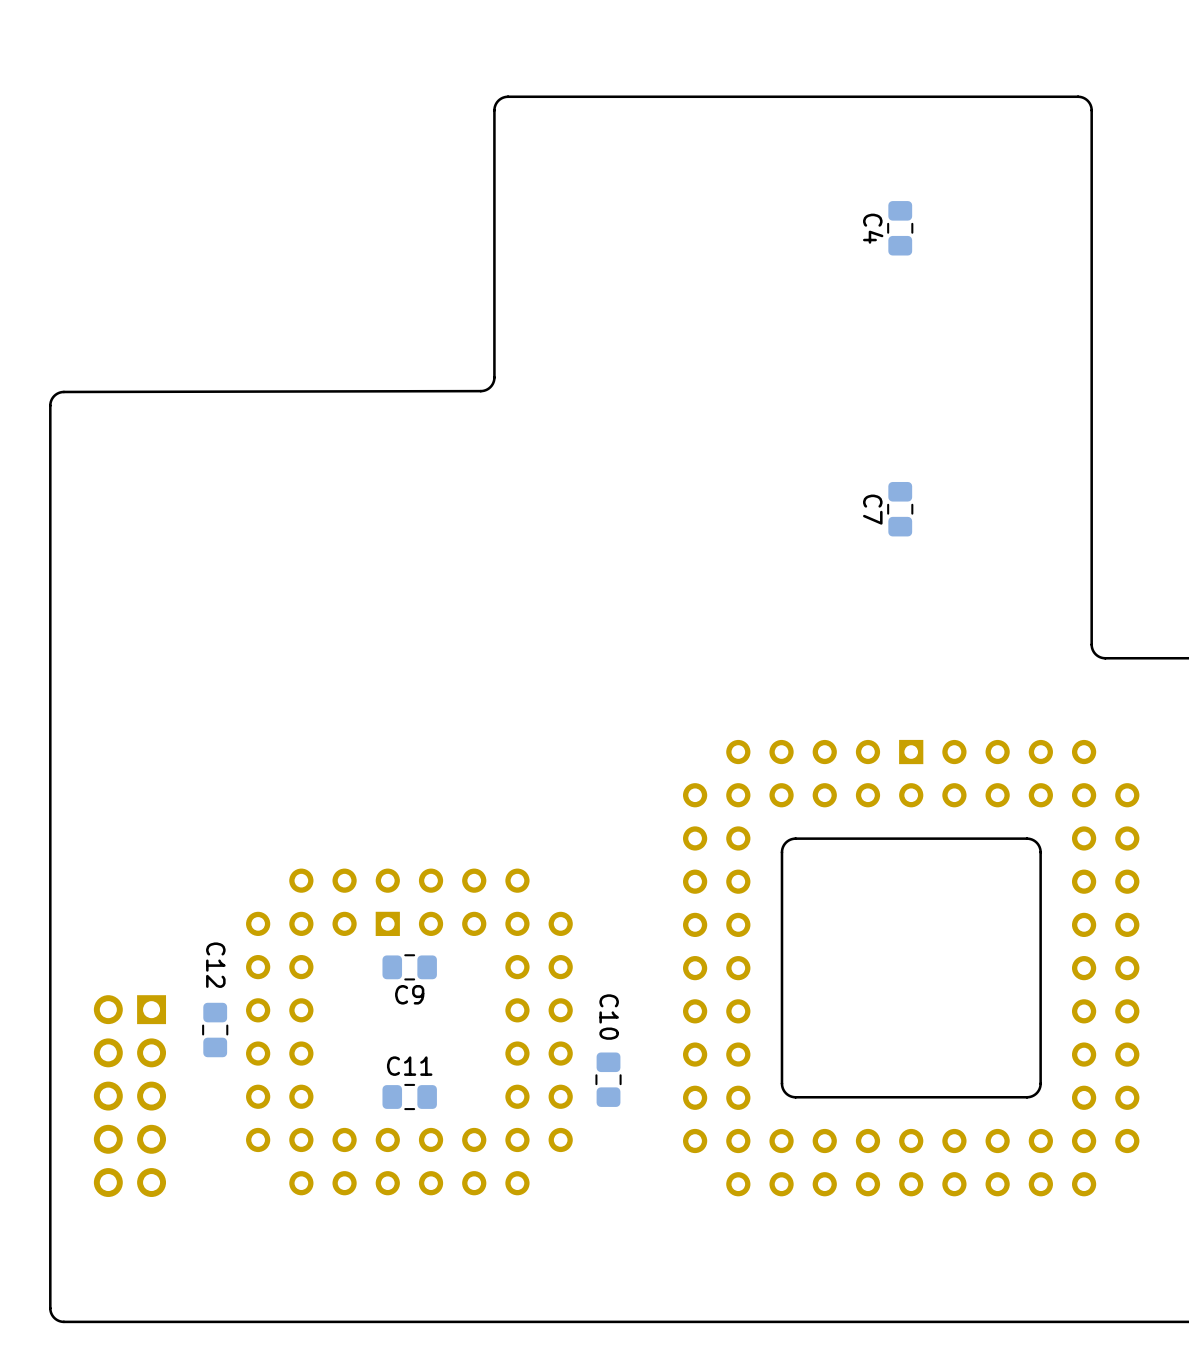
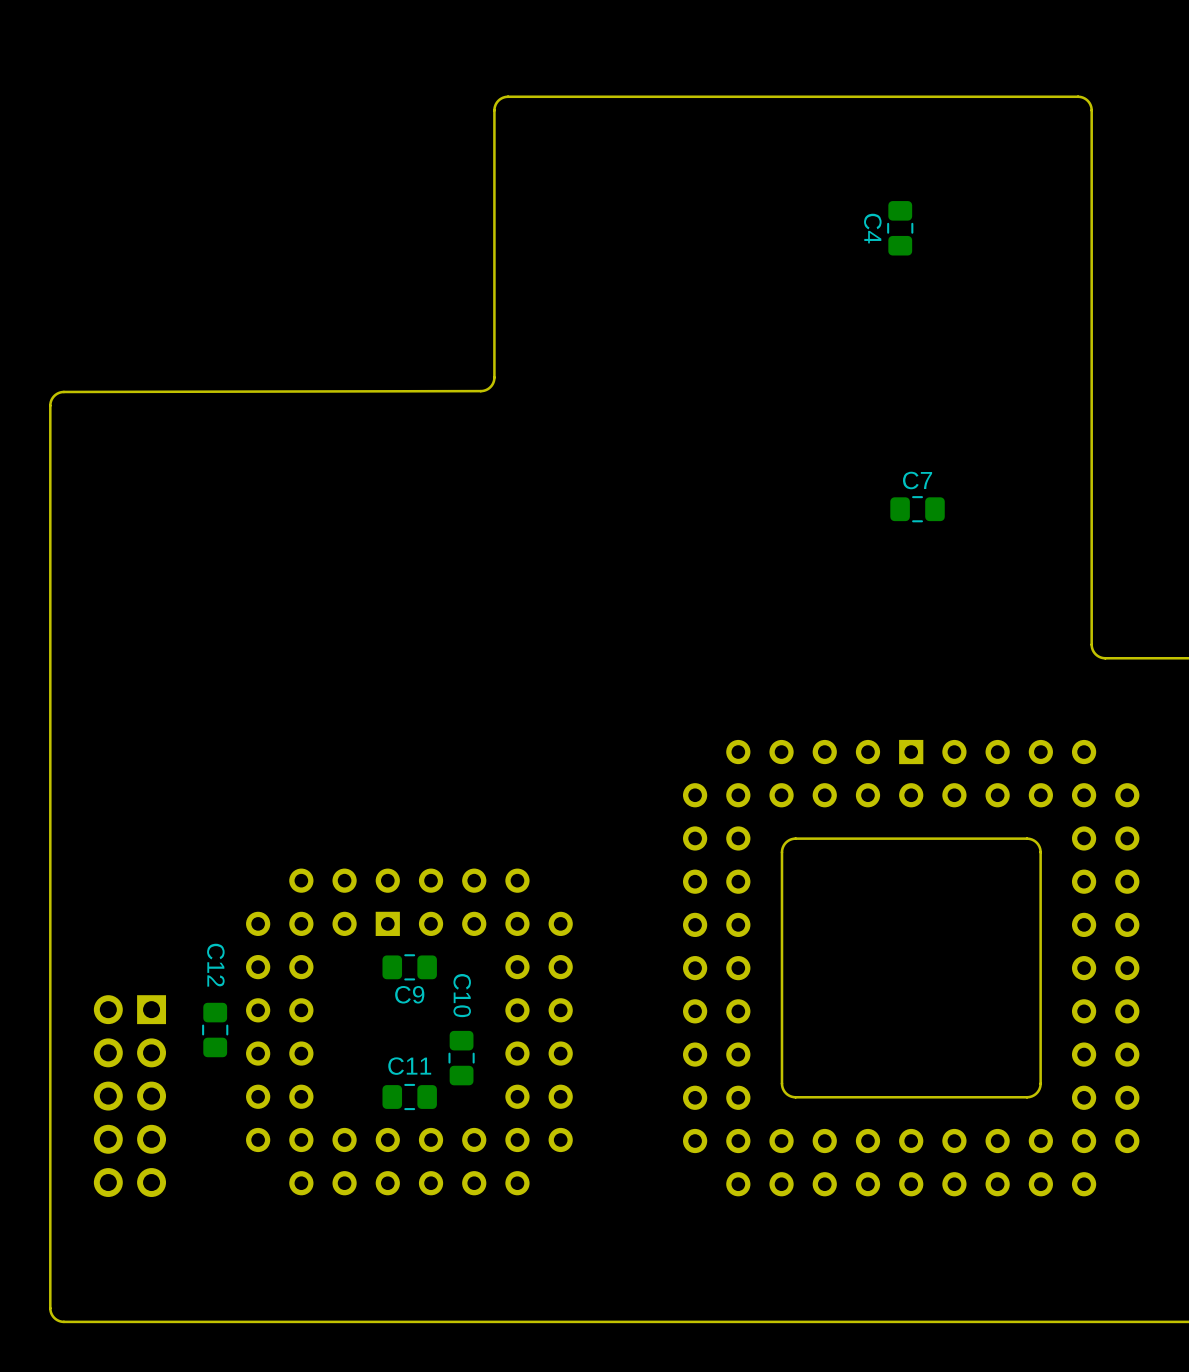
C7 rotation: 0° (900, 509) -> 90° clockwise (917, 509)
C10 position: (608, 1079) -> (461, 1058)

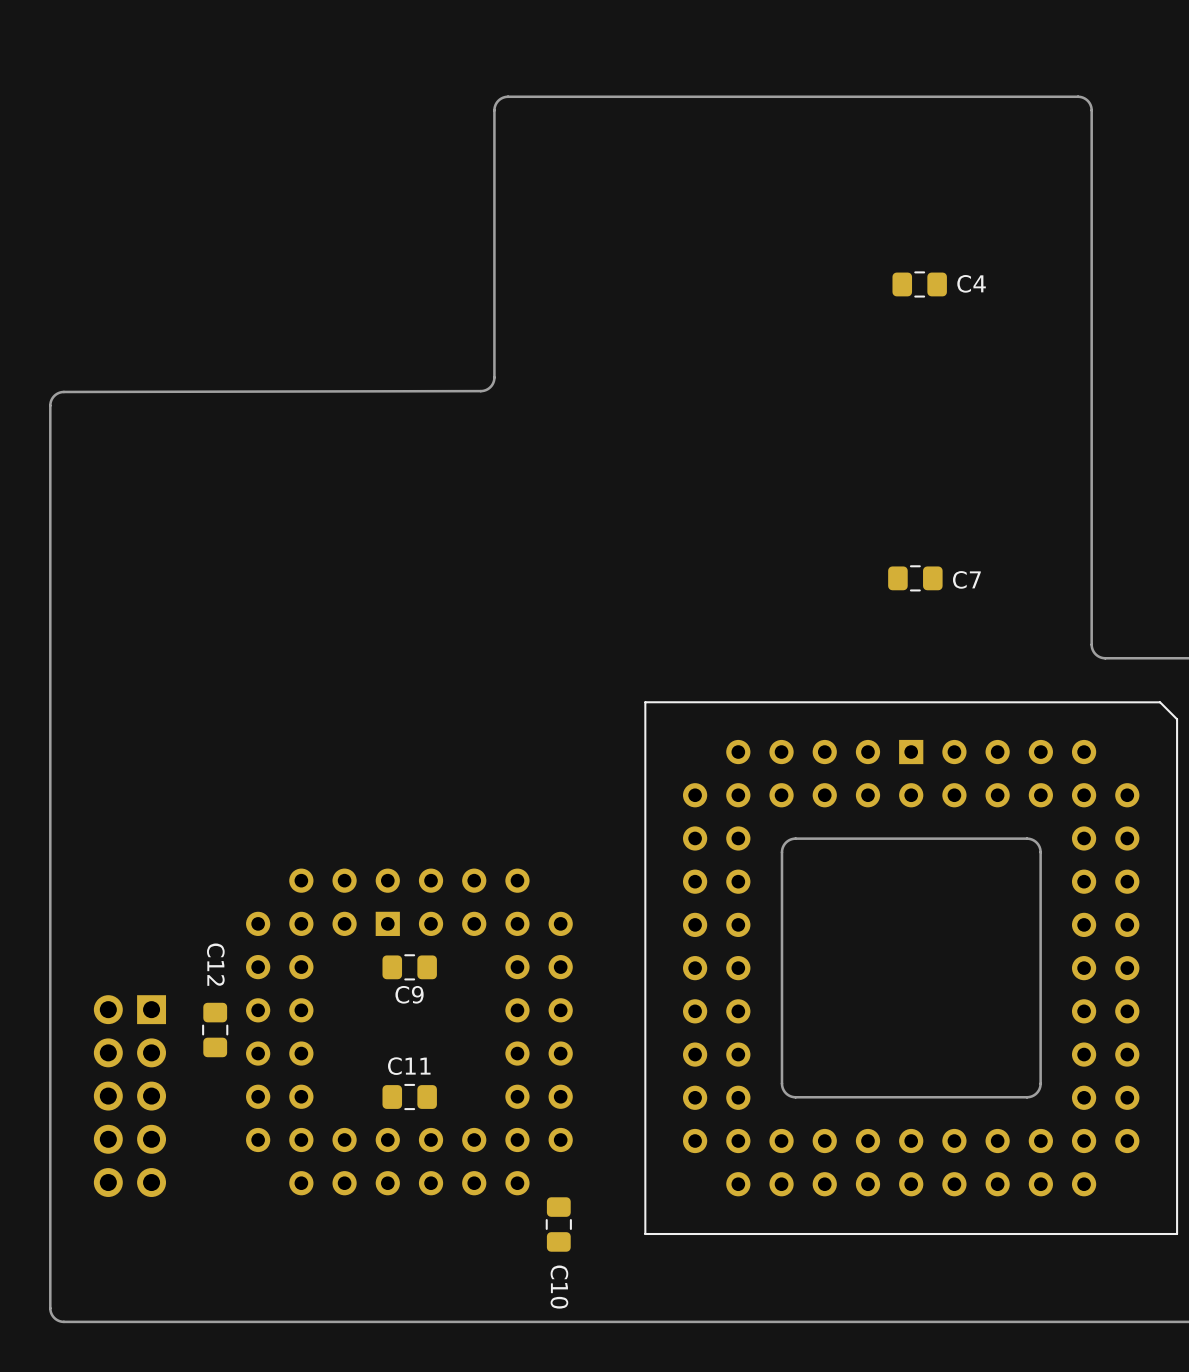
C4 name position: C4 (872, 228) -> C4 (971, 283)
C4 rotation: 0° (900, 228) -> 90° clockwise (919, 284)
C4 position: (900, 228) -> (919, 284)
C7 name position: C7 (917, 480) -> C7 (966, 579)
C7 position: (917, 509) -> (915, 578)
part footprint: [683, 739, 1140, 1197] -> [644, 701, 1179, 1236]
C10 name position: C10 (462, 995) -> C10 (559, 1287)
C10 position: (461, 1058) -> (558, 1224)

